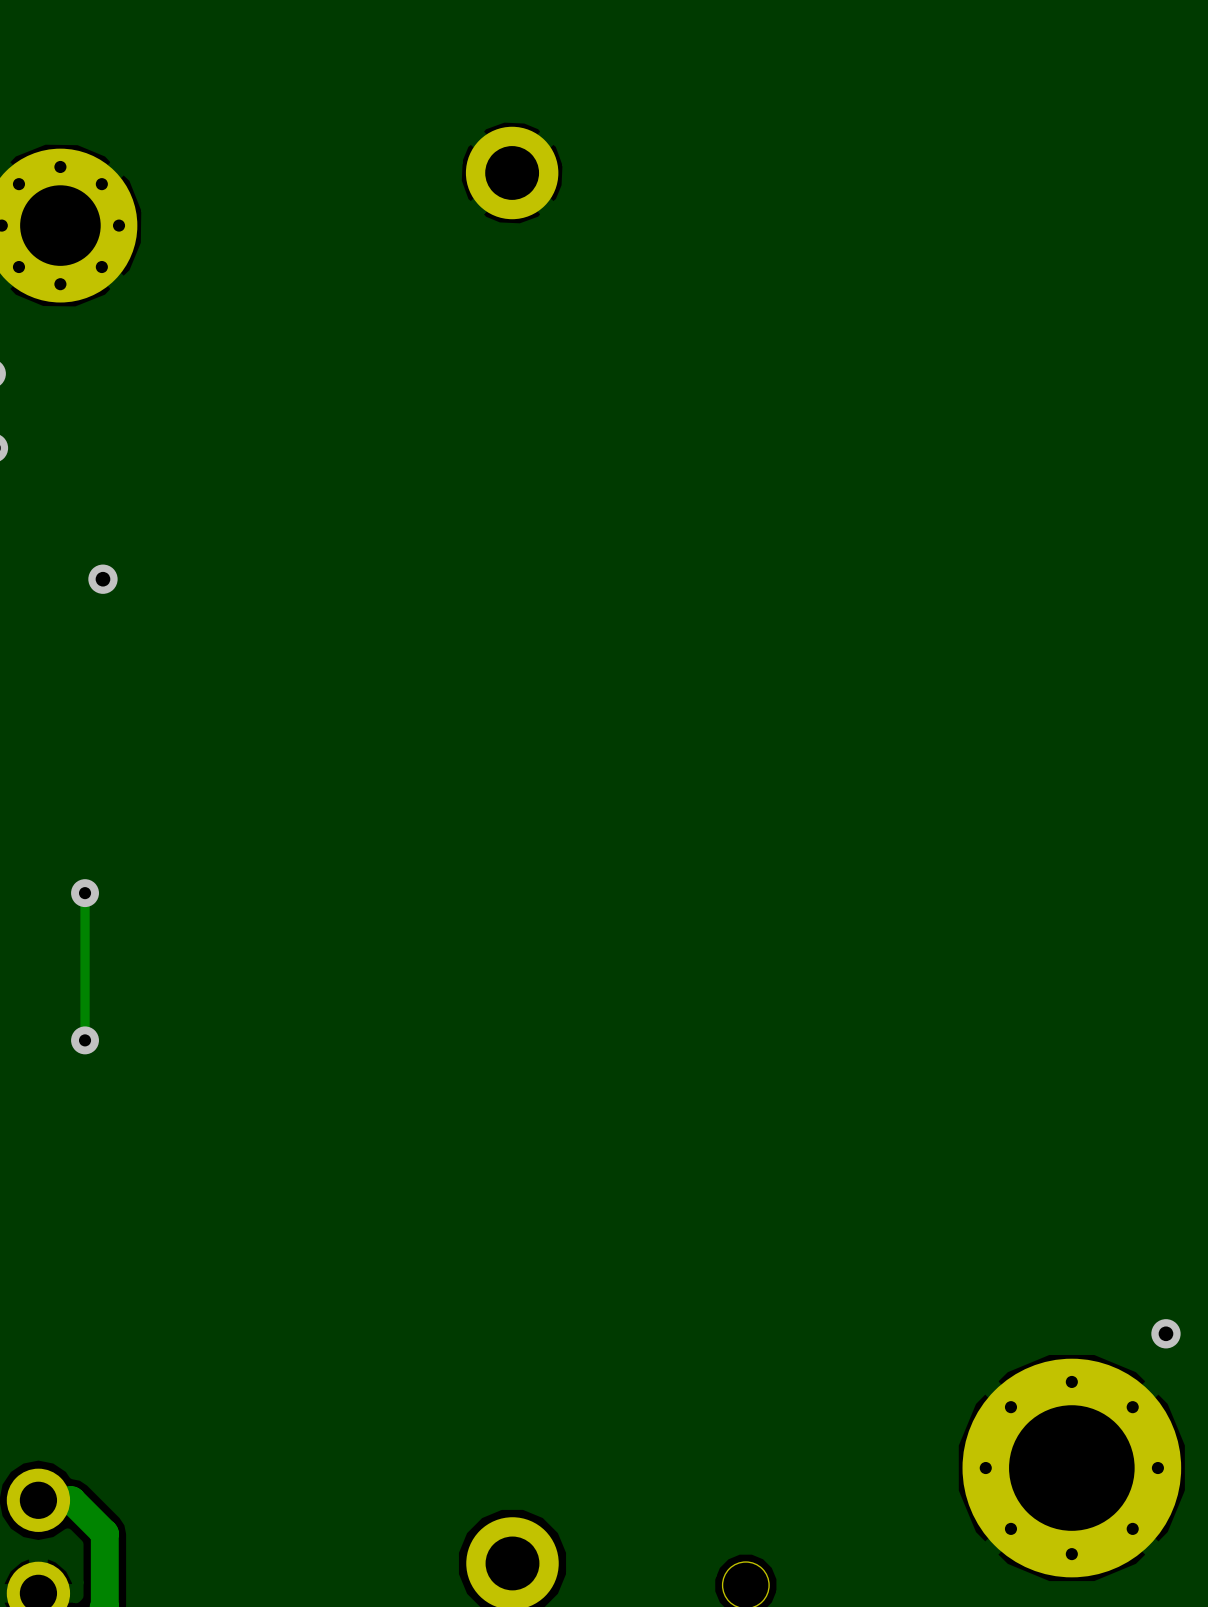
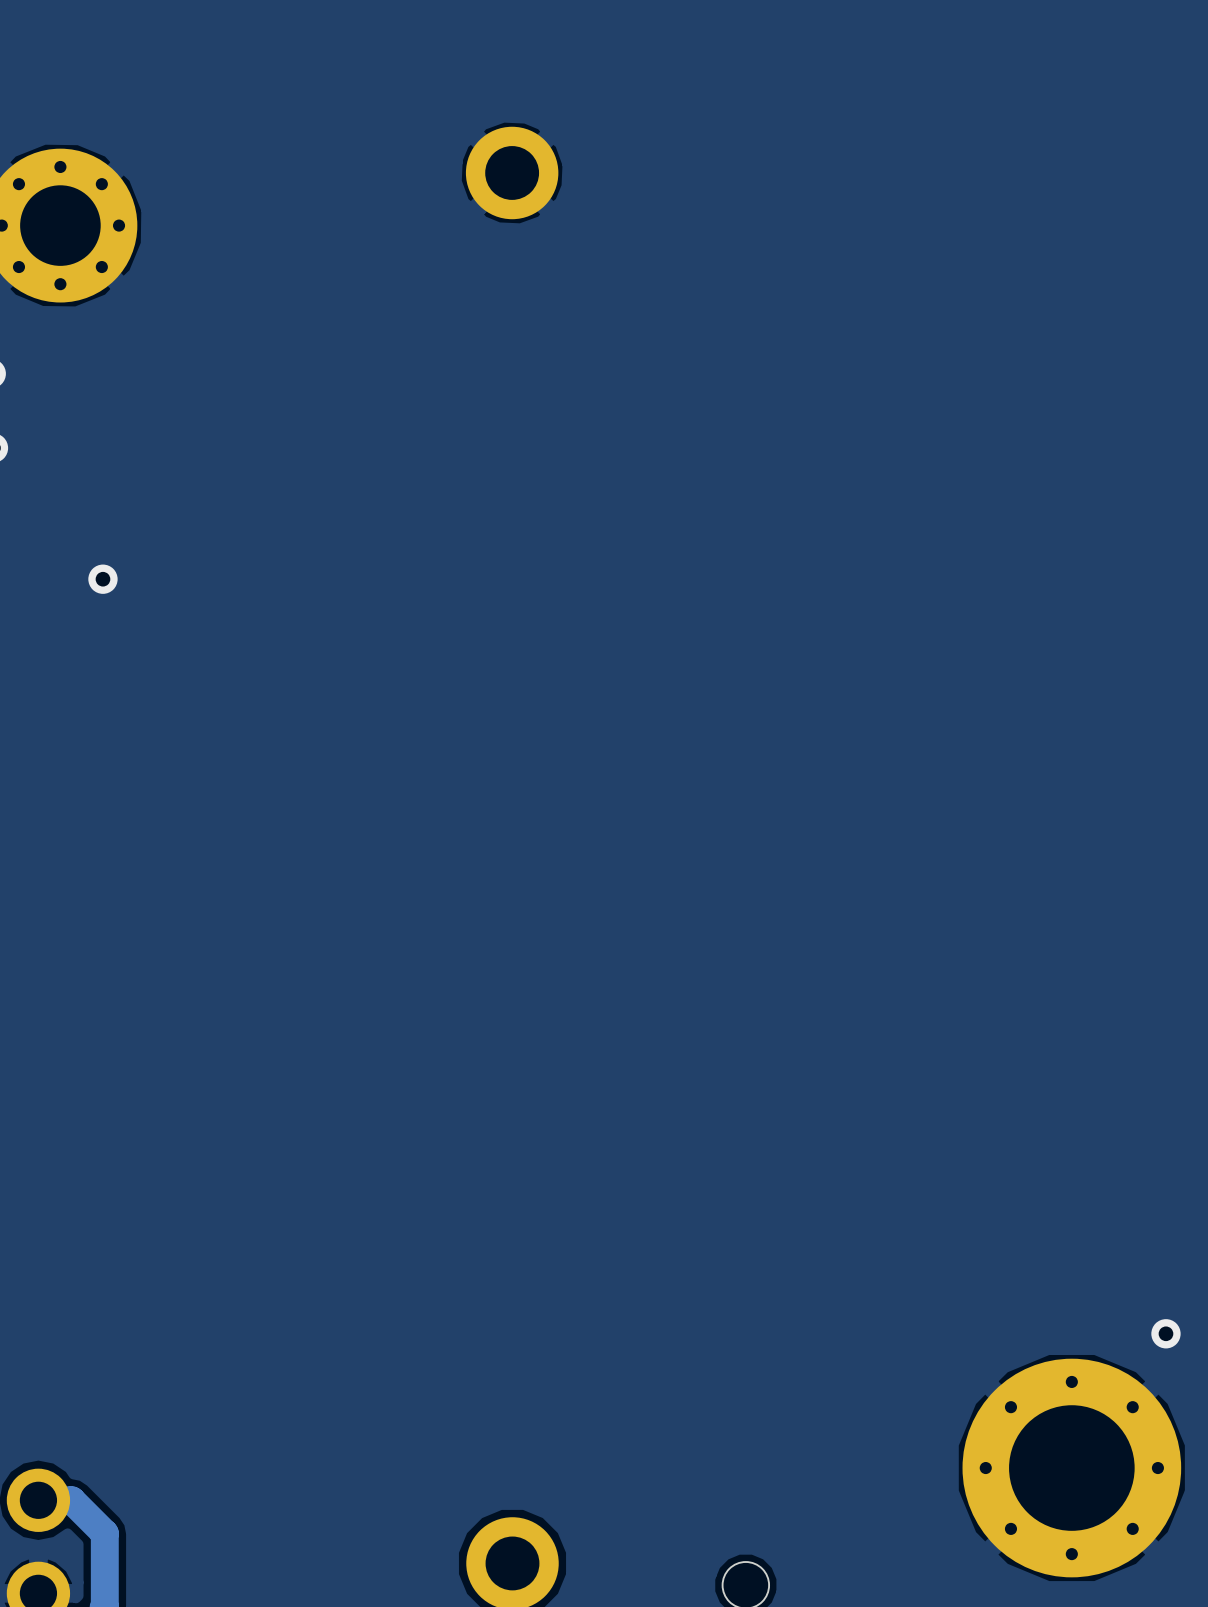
track: (85, 893) (85, 1040) -> none
via: (85, 893) -> none
via: (85, 1040) -> none

